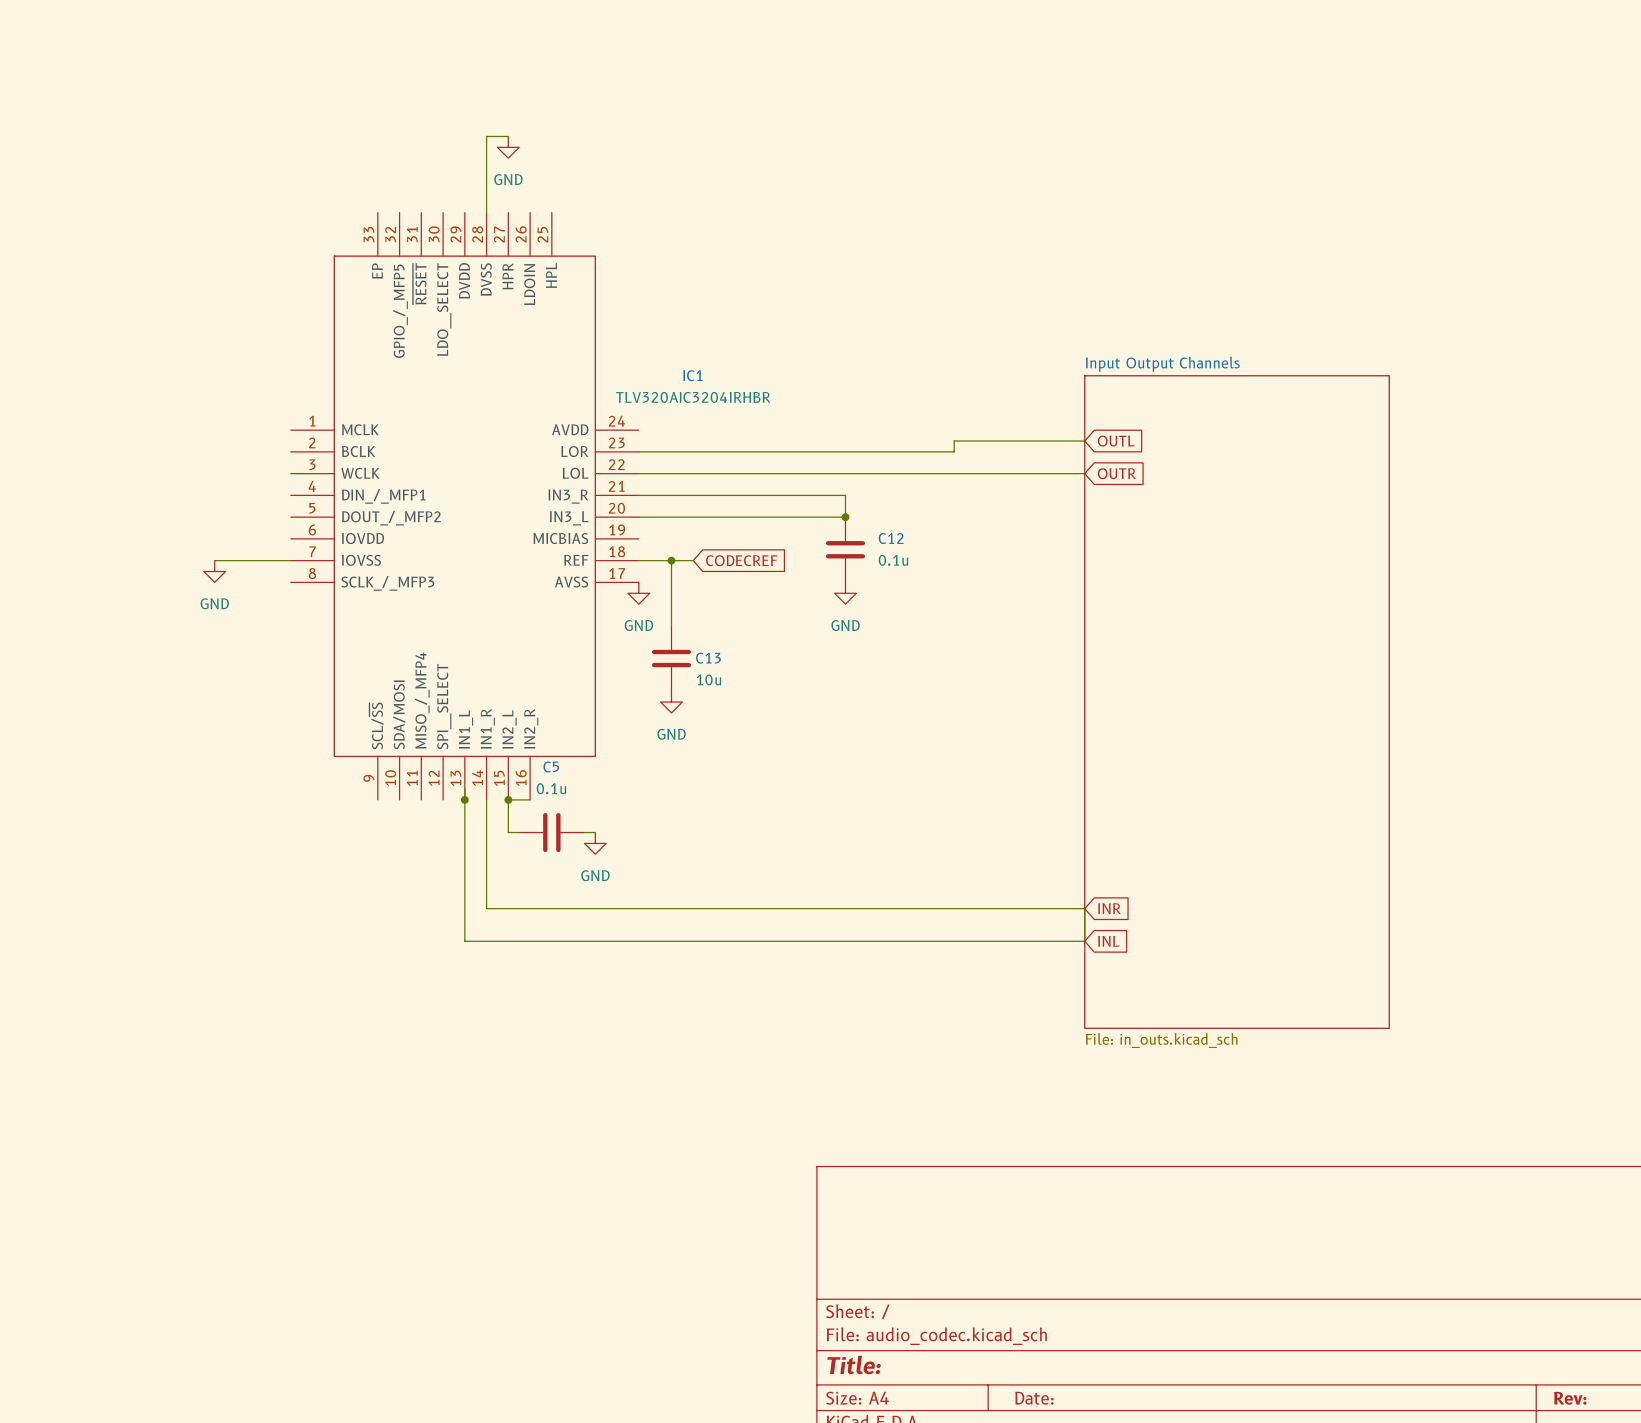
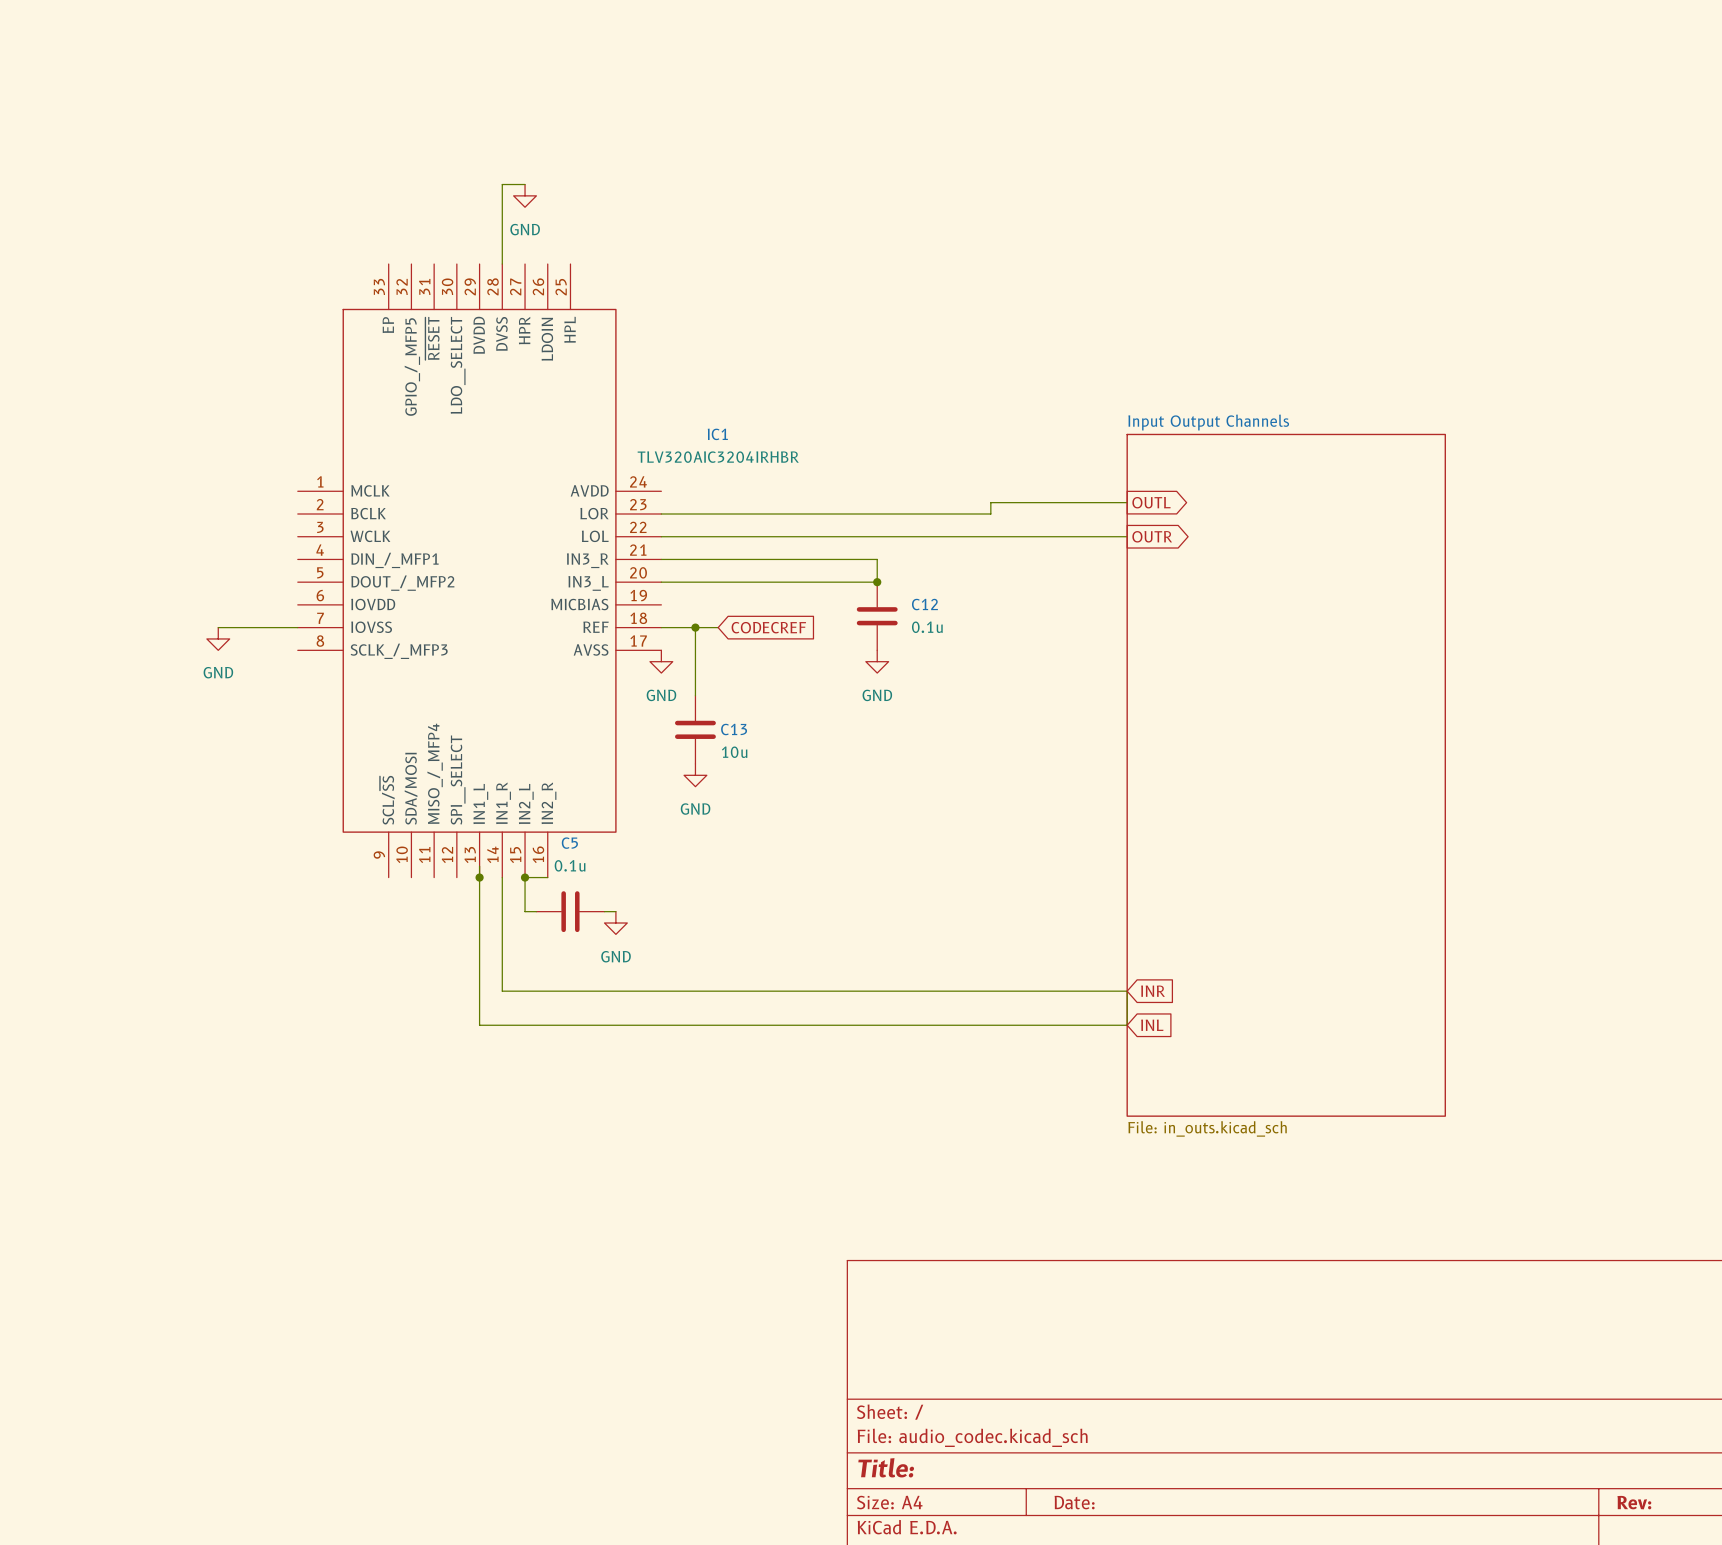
global label shape: input (1116, 441) -> output (1151, 502)
global label shape: input (1116, 473) -> output (1152, 536)

